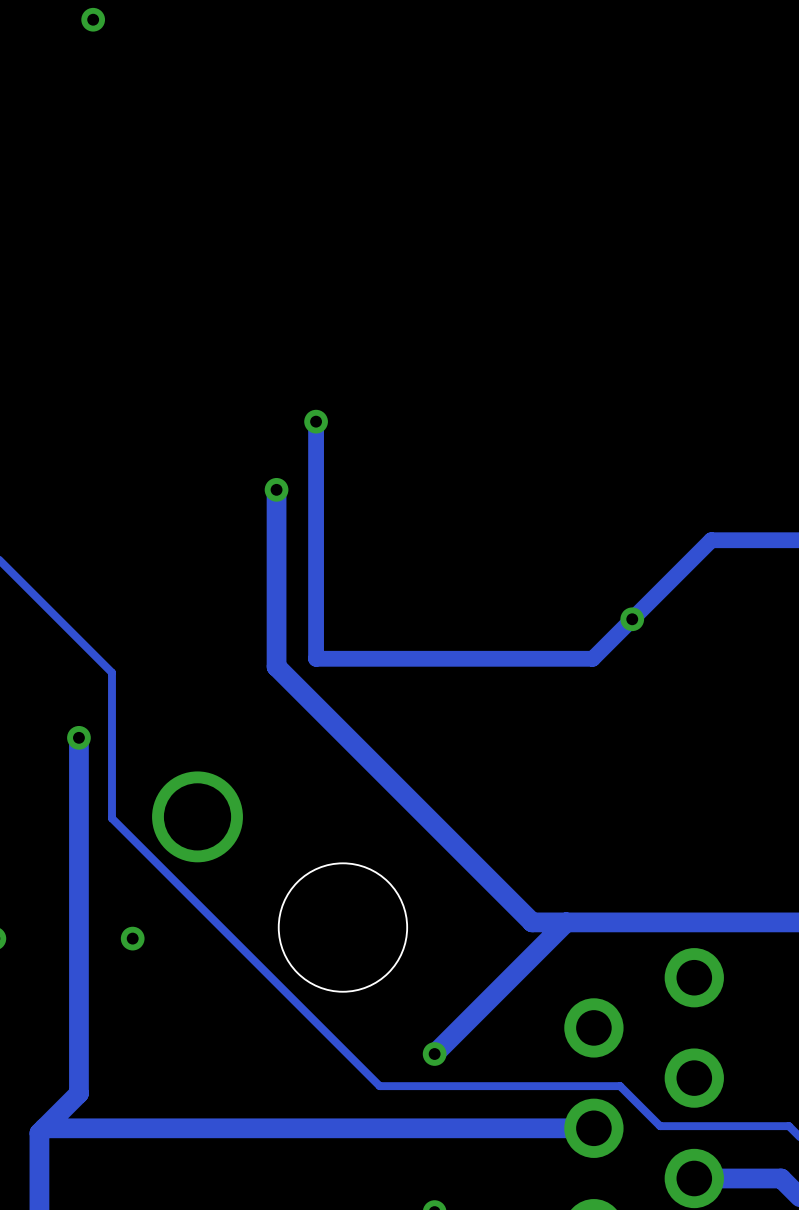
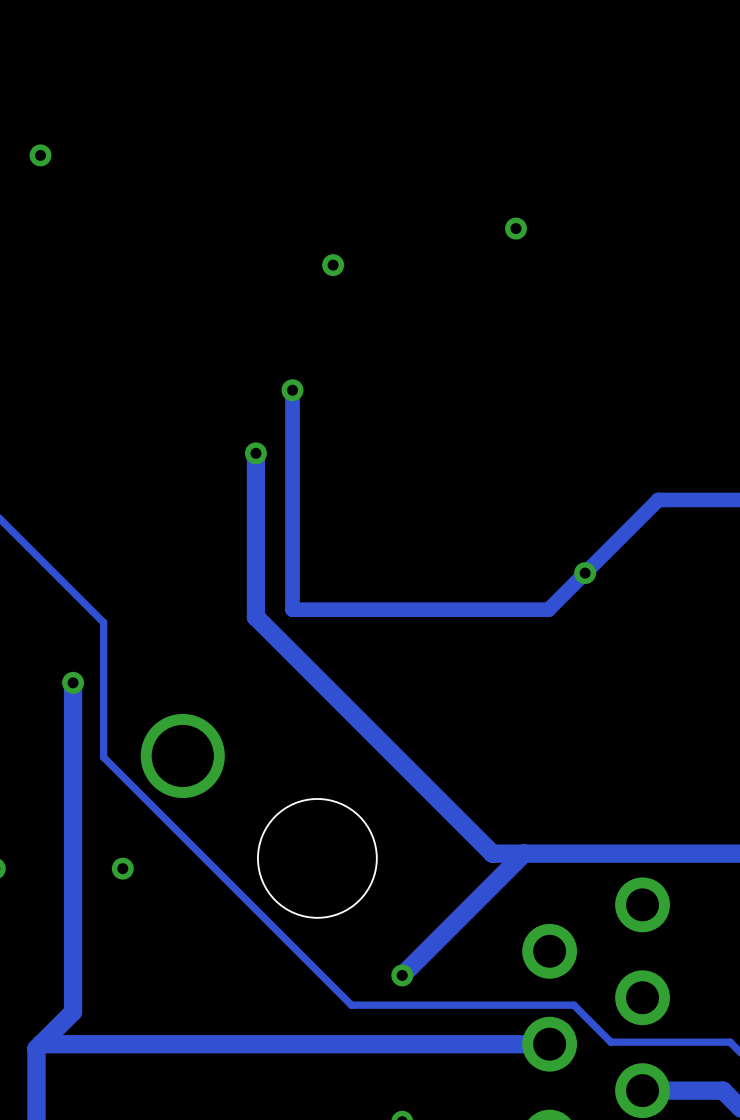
via position: (93, 19) -> (40, 155)
via: none -> (515, 228)
via: none -> (333, 265)

